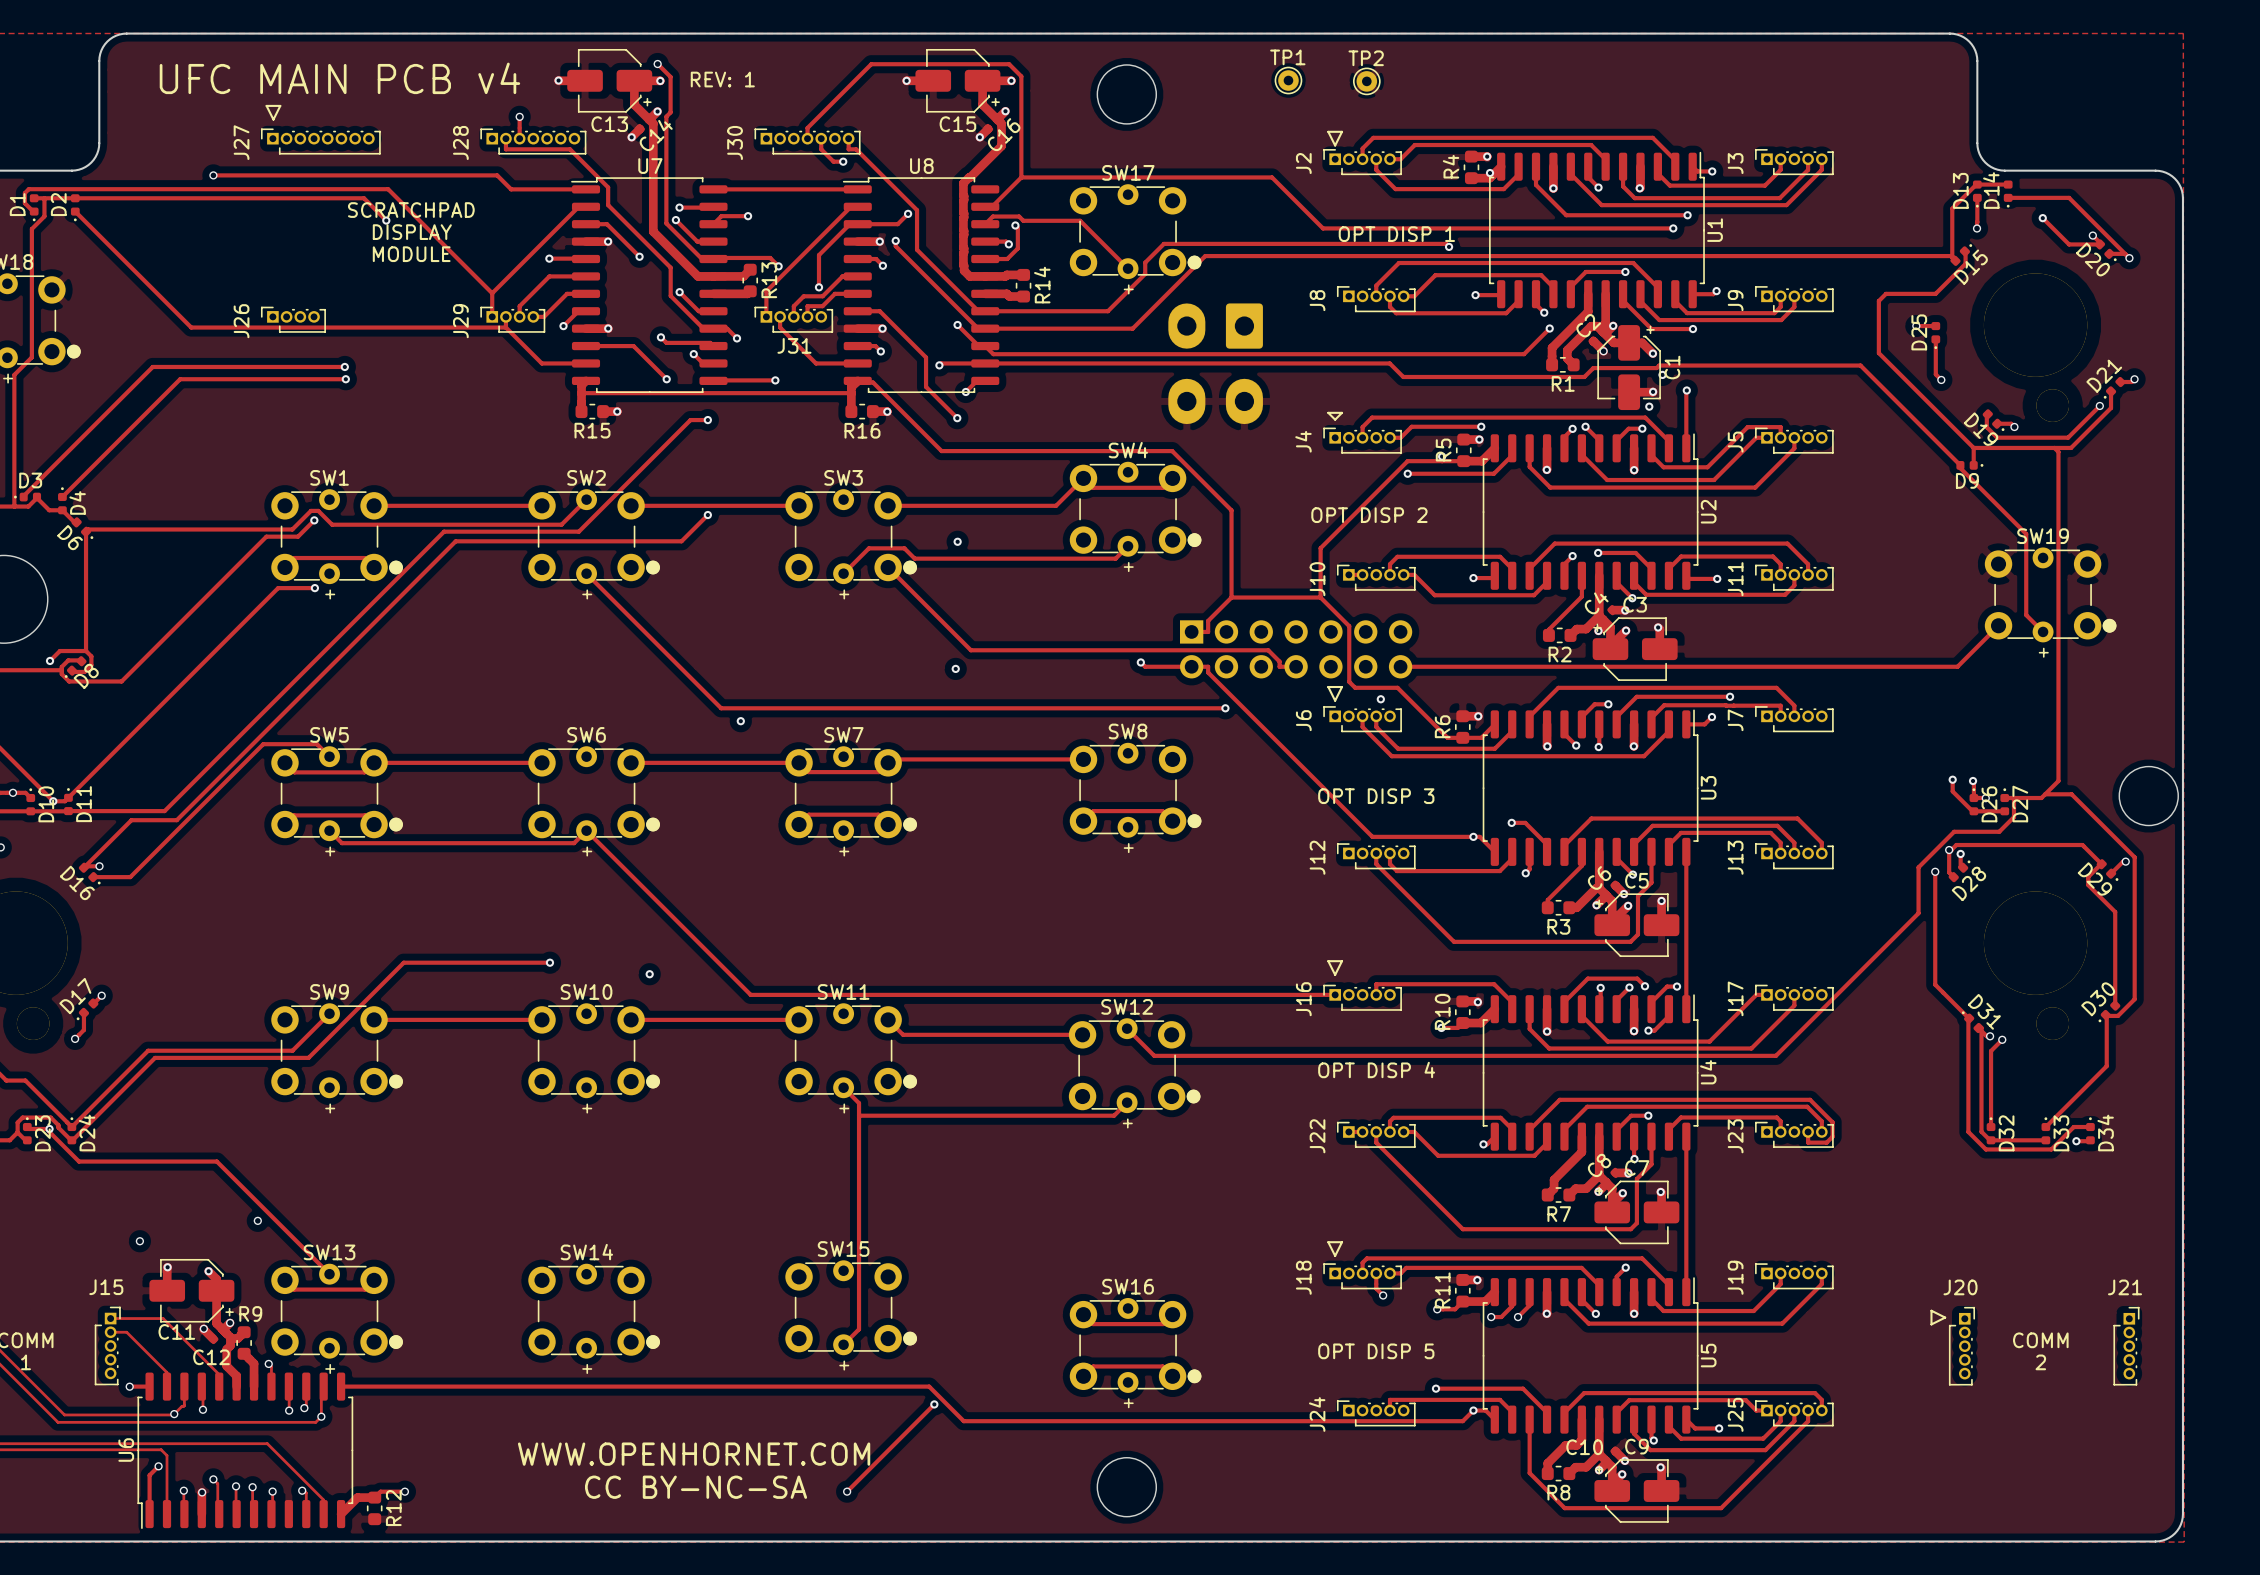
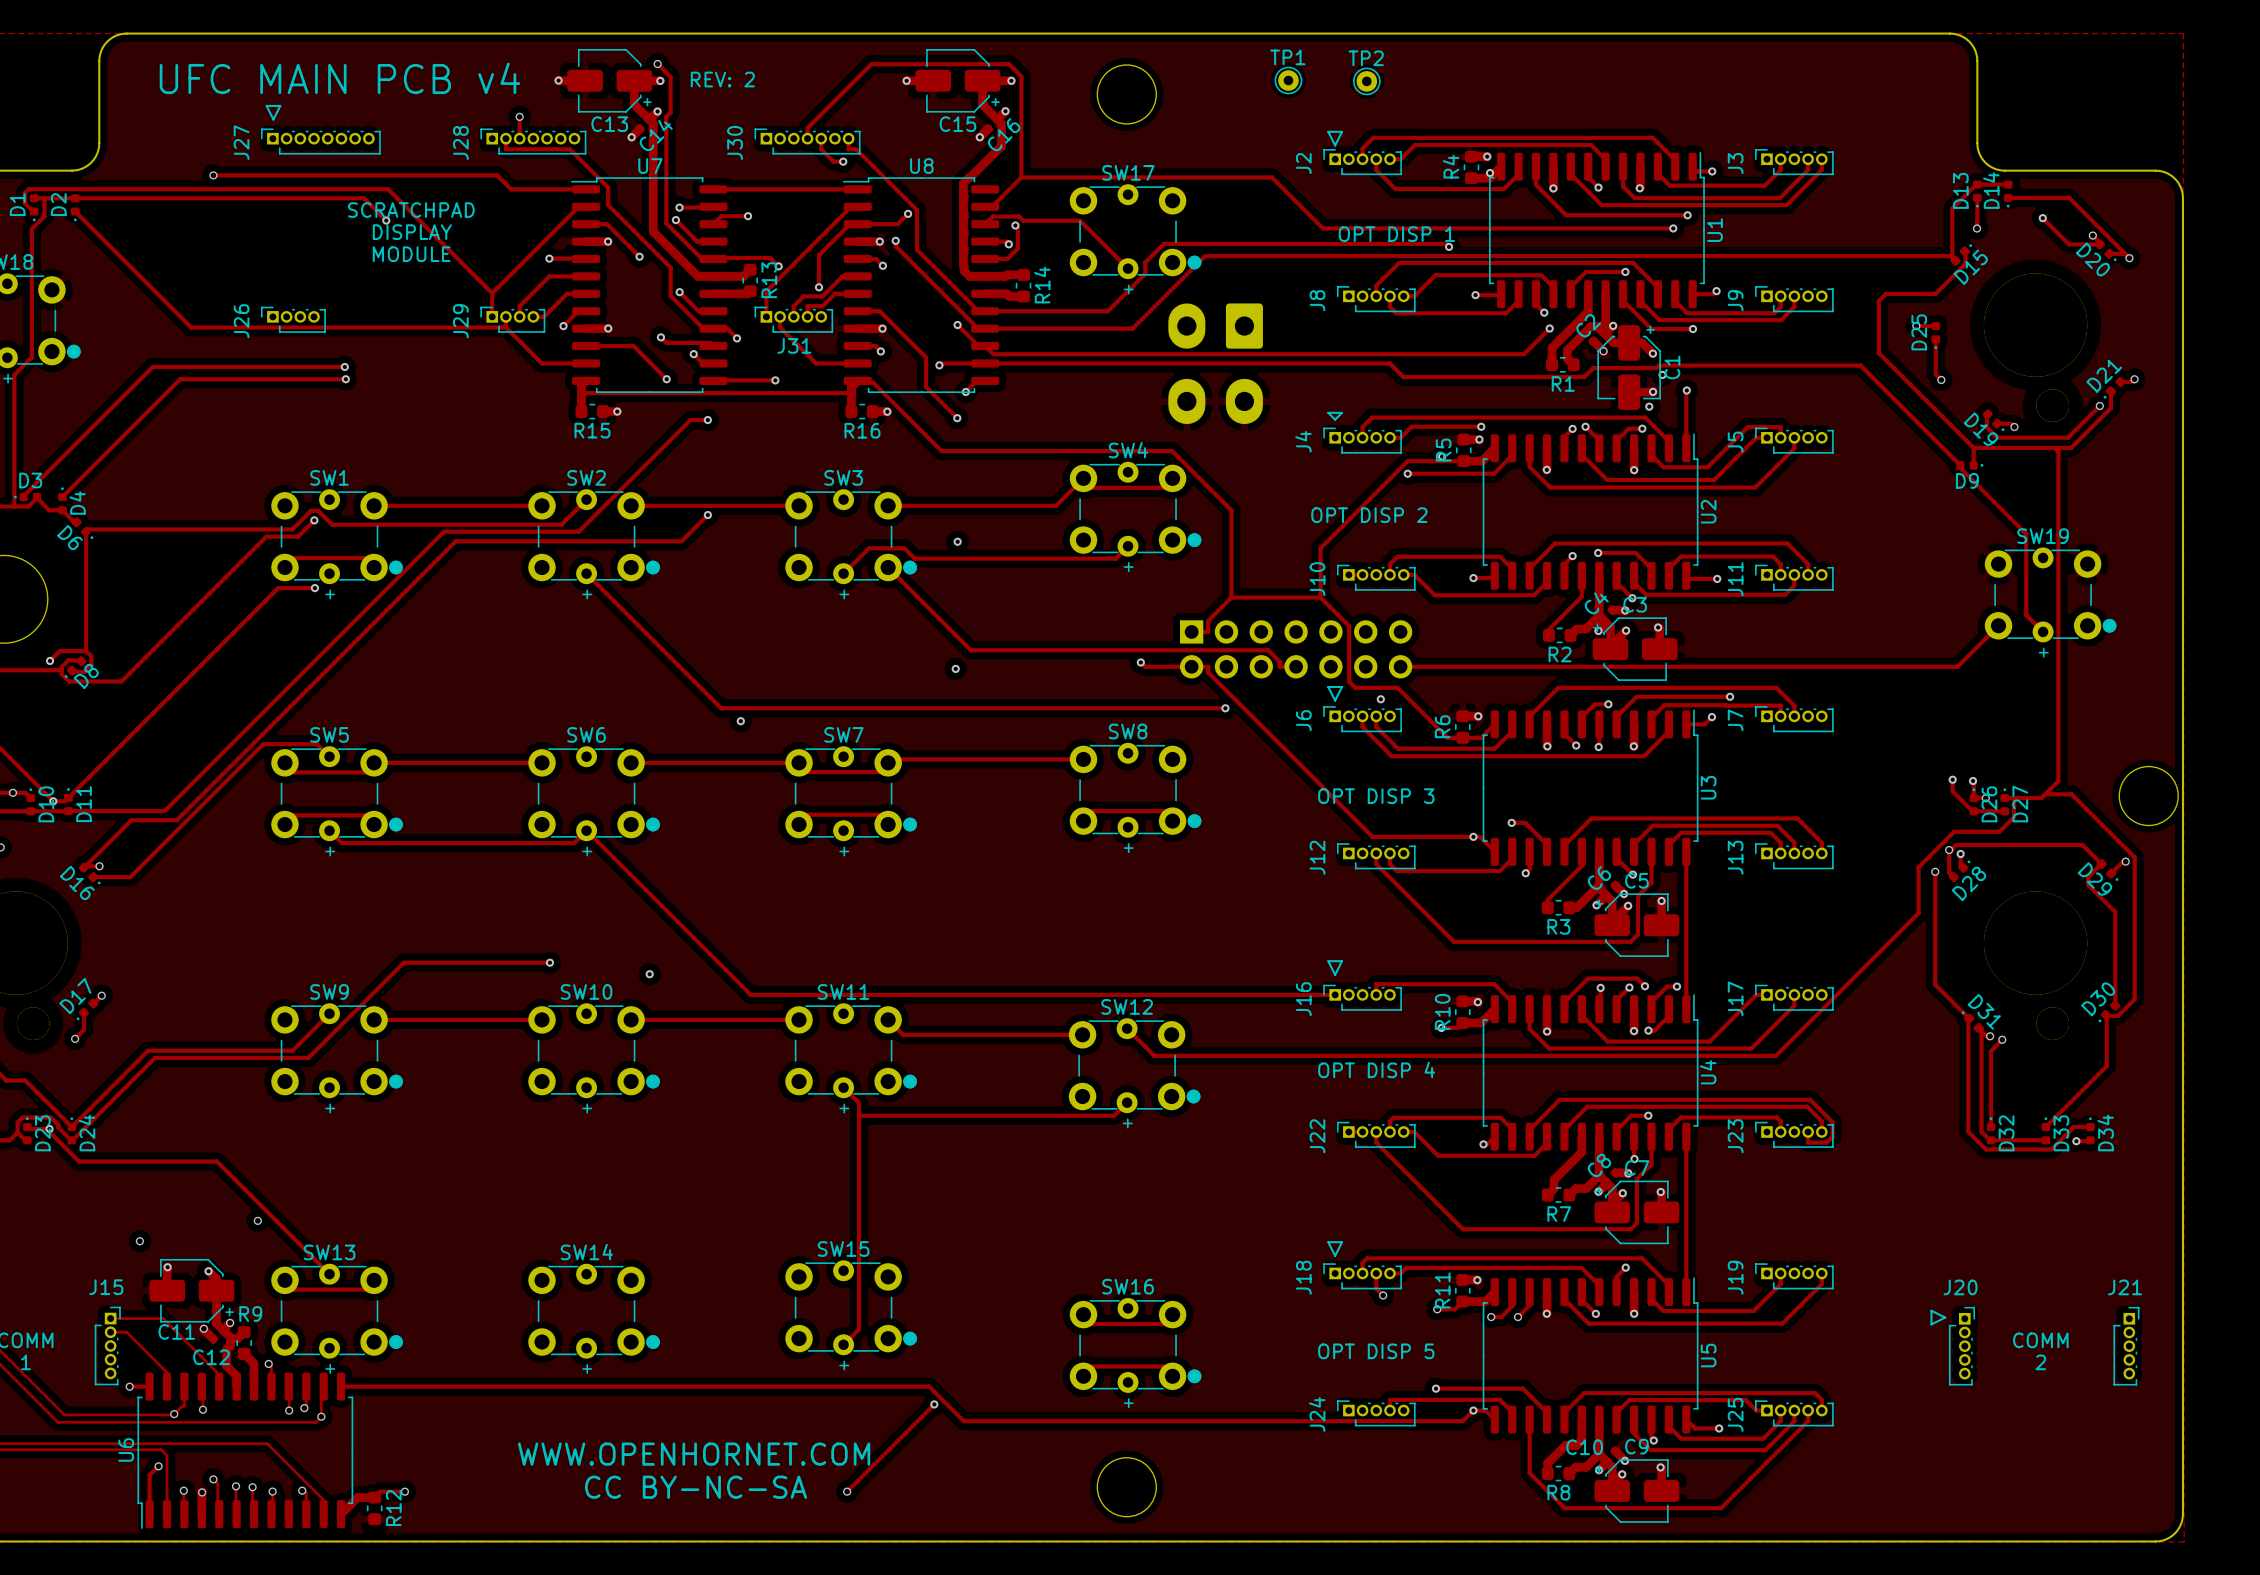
text: REV: 1 (722, 79) -> REV: 2 (722, 79)

